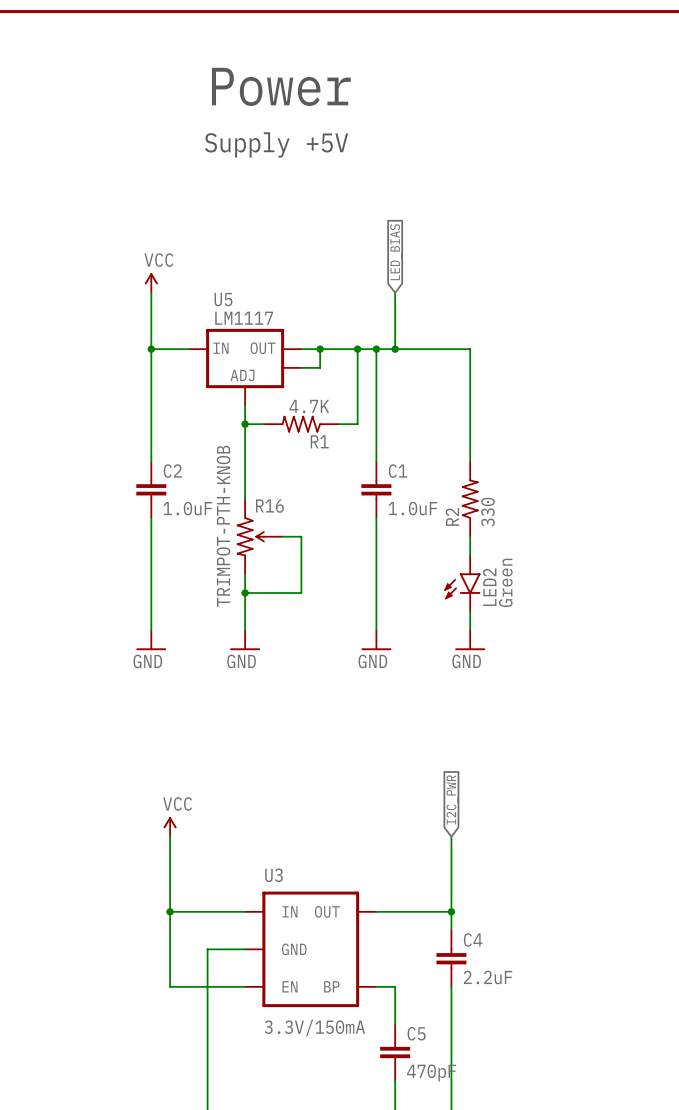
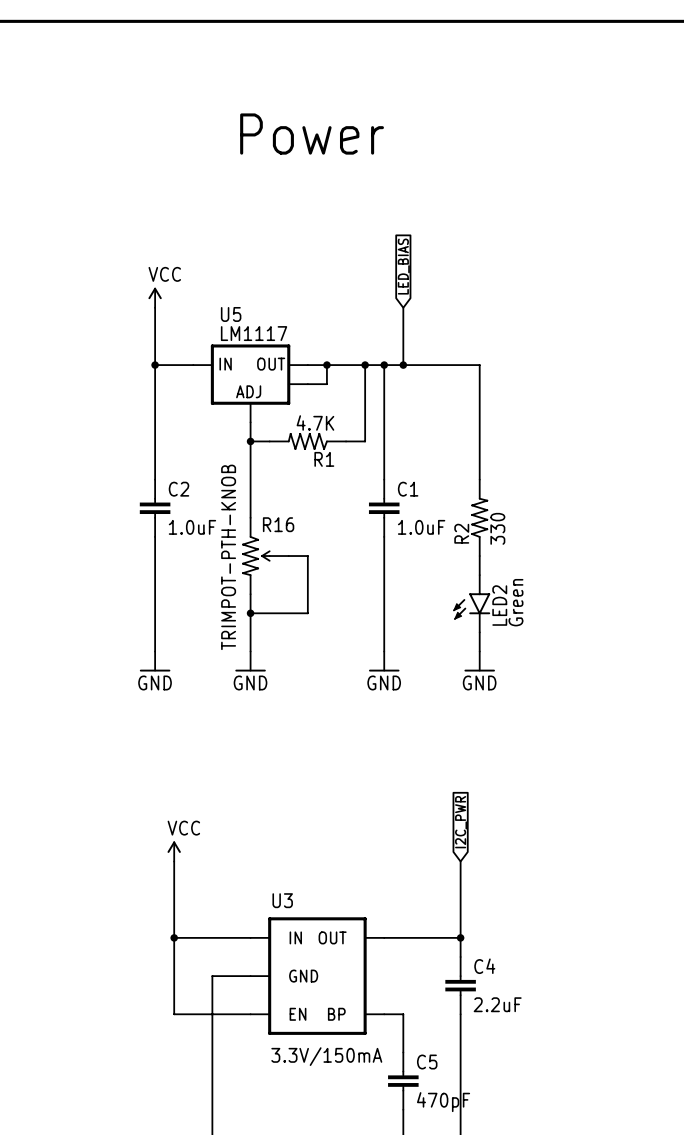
text position: Power (281, 86) -> Power (312, 134)
text: Supply +5V (276, 144) -> none

